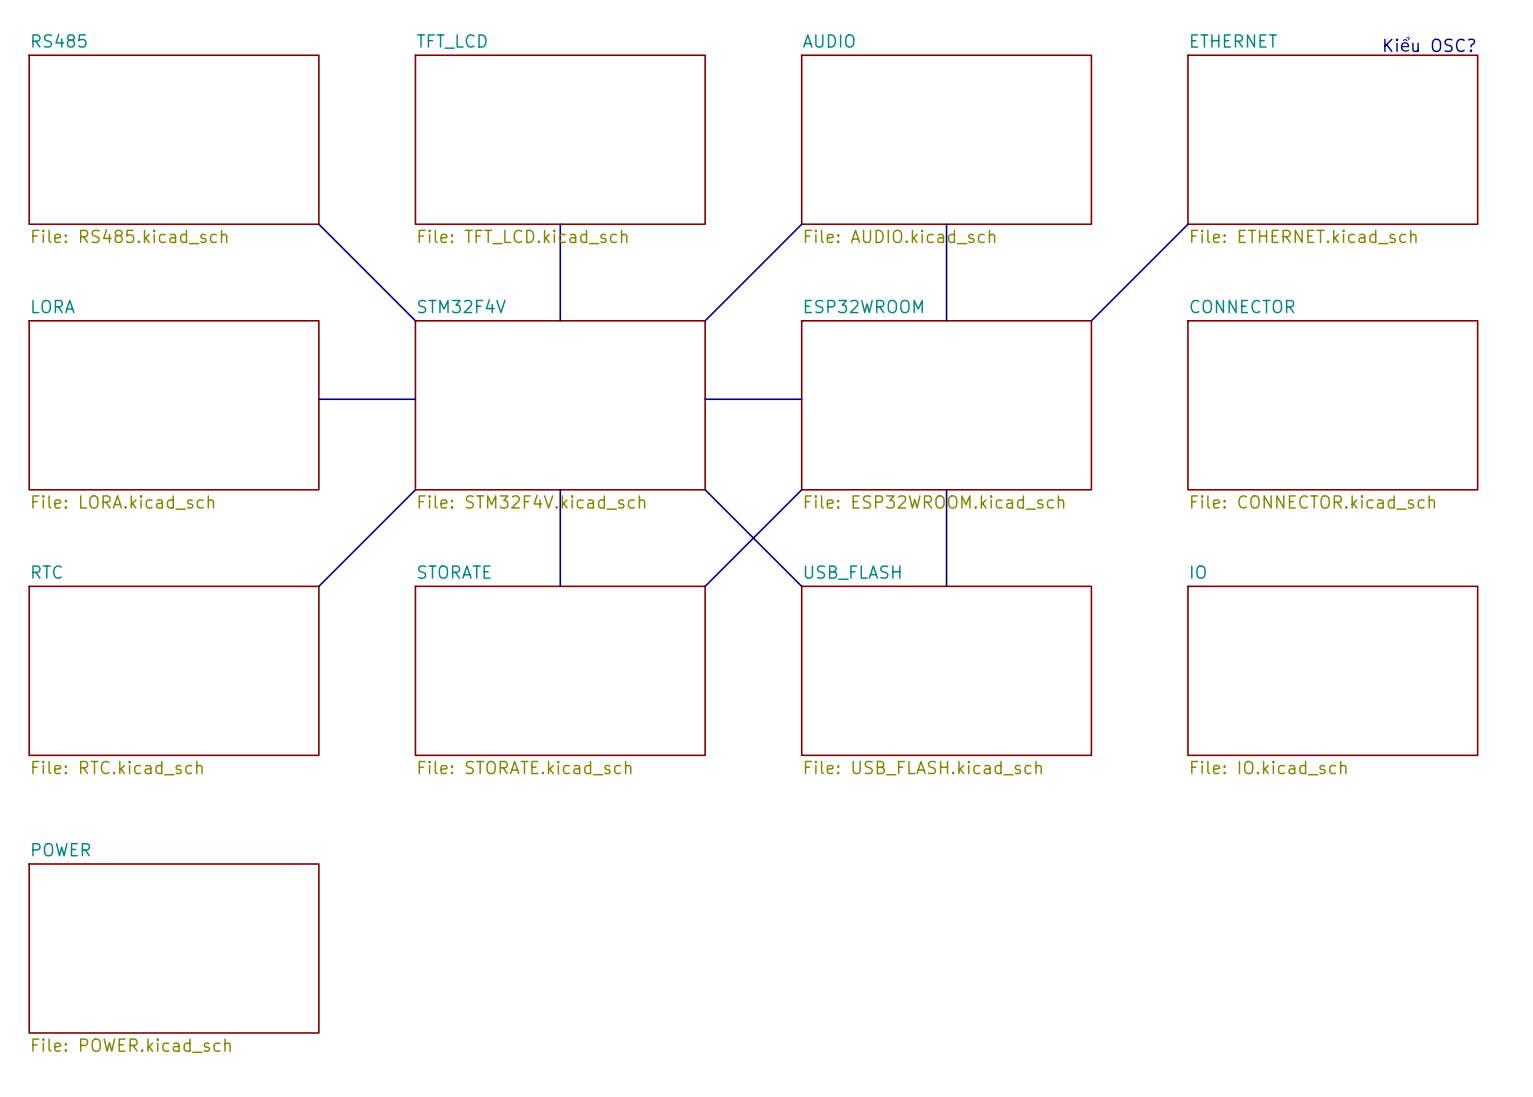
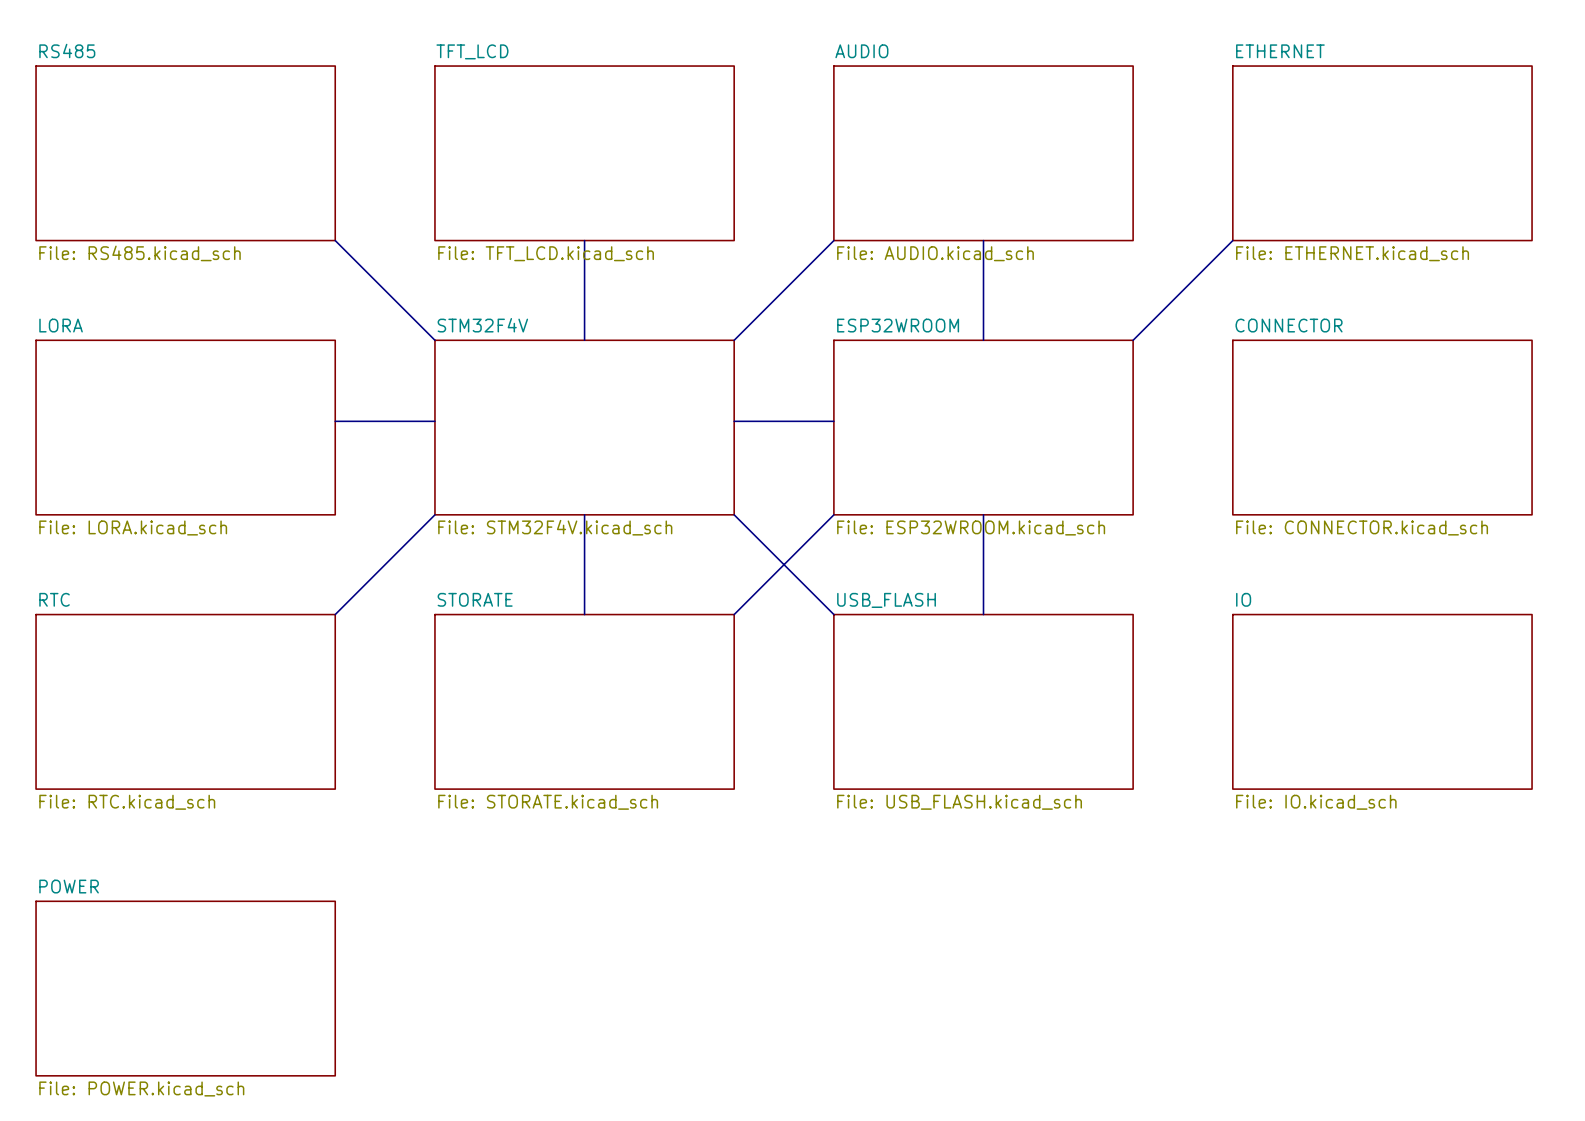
text: Kiểu OSC? (1429, 44) -> none

